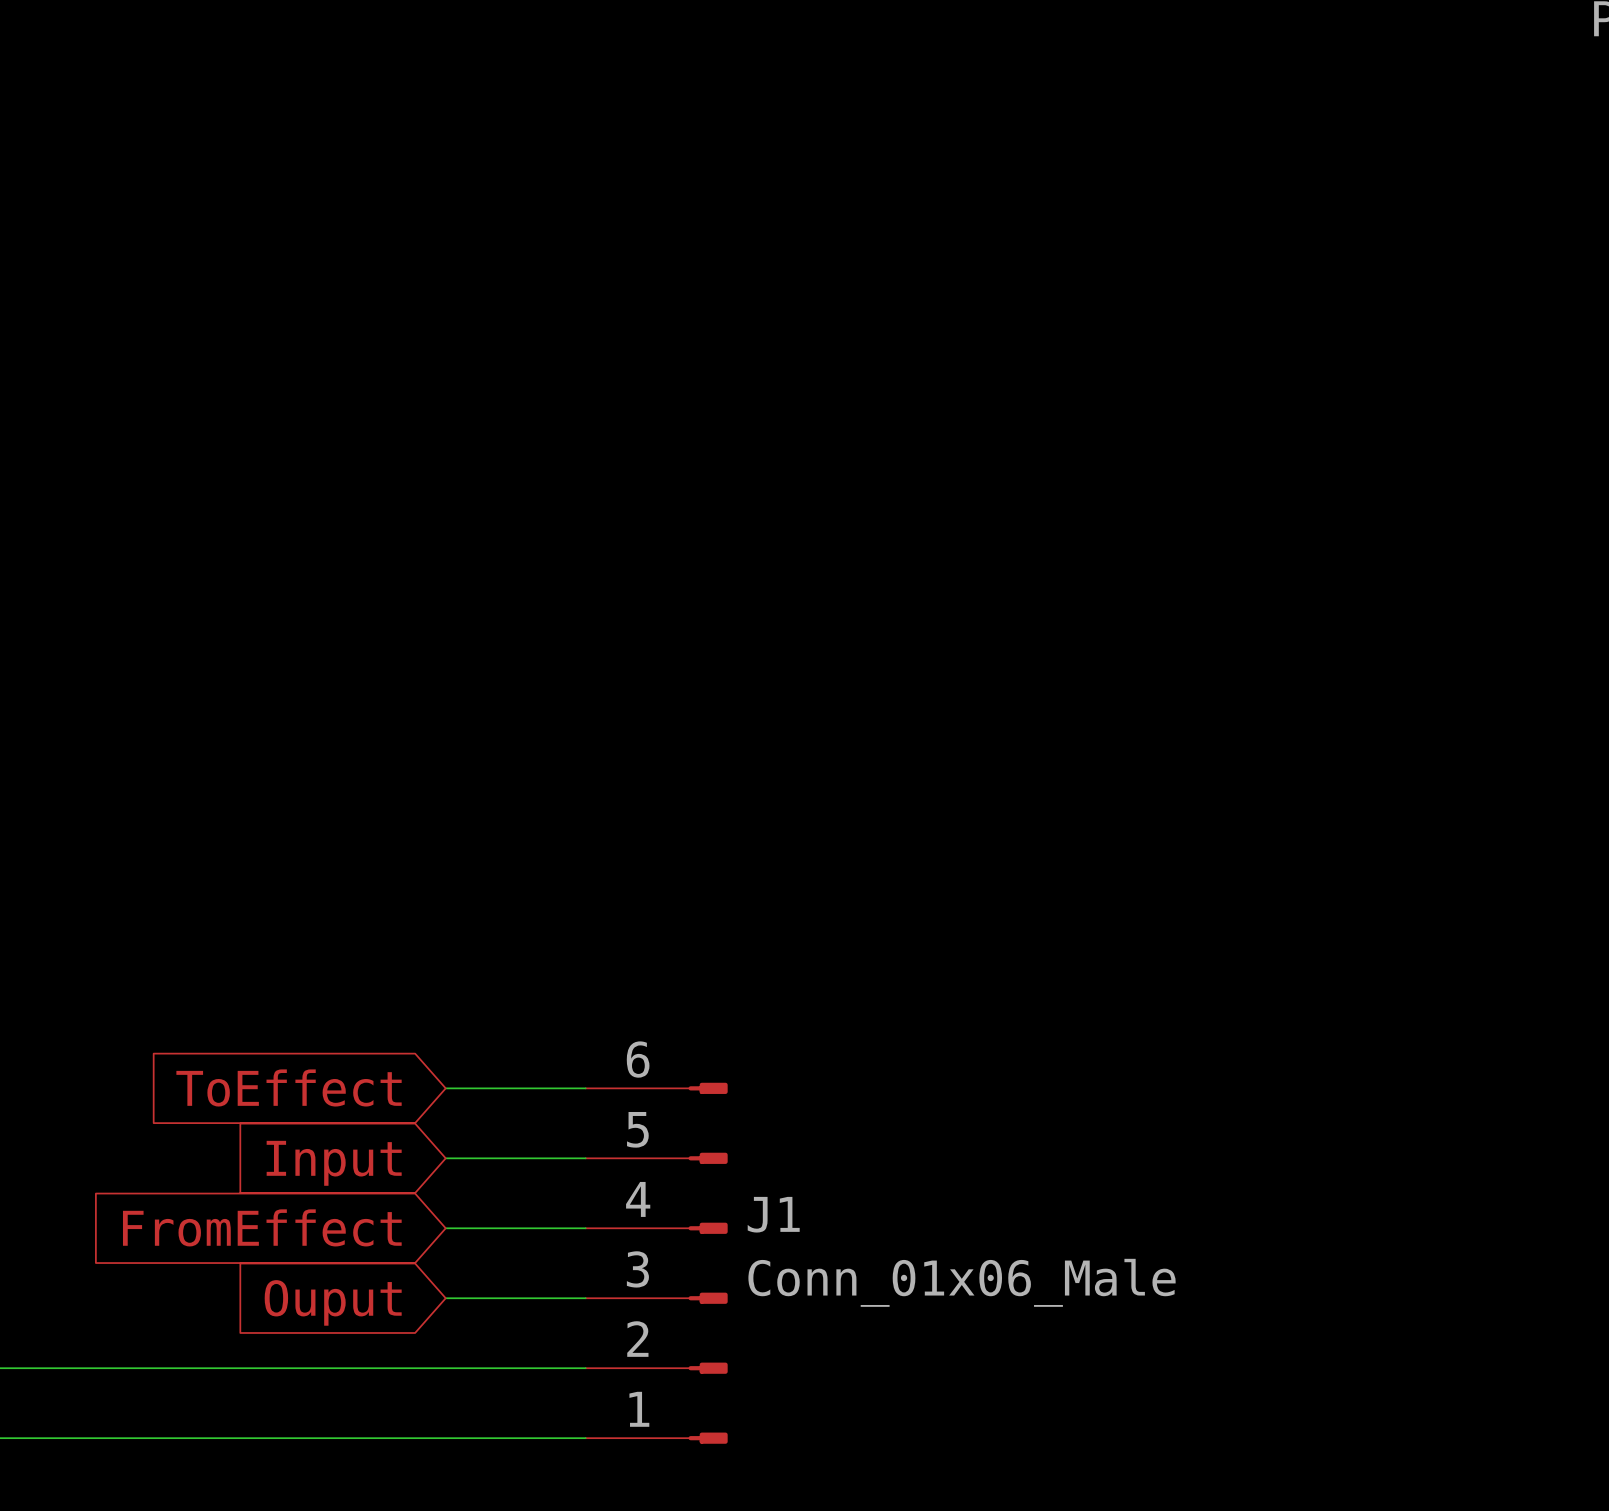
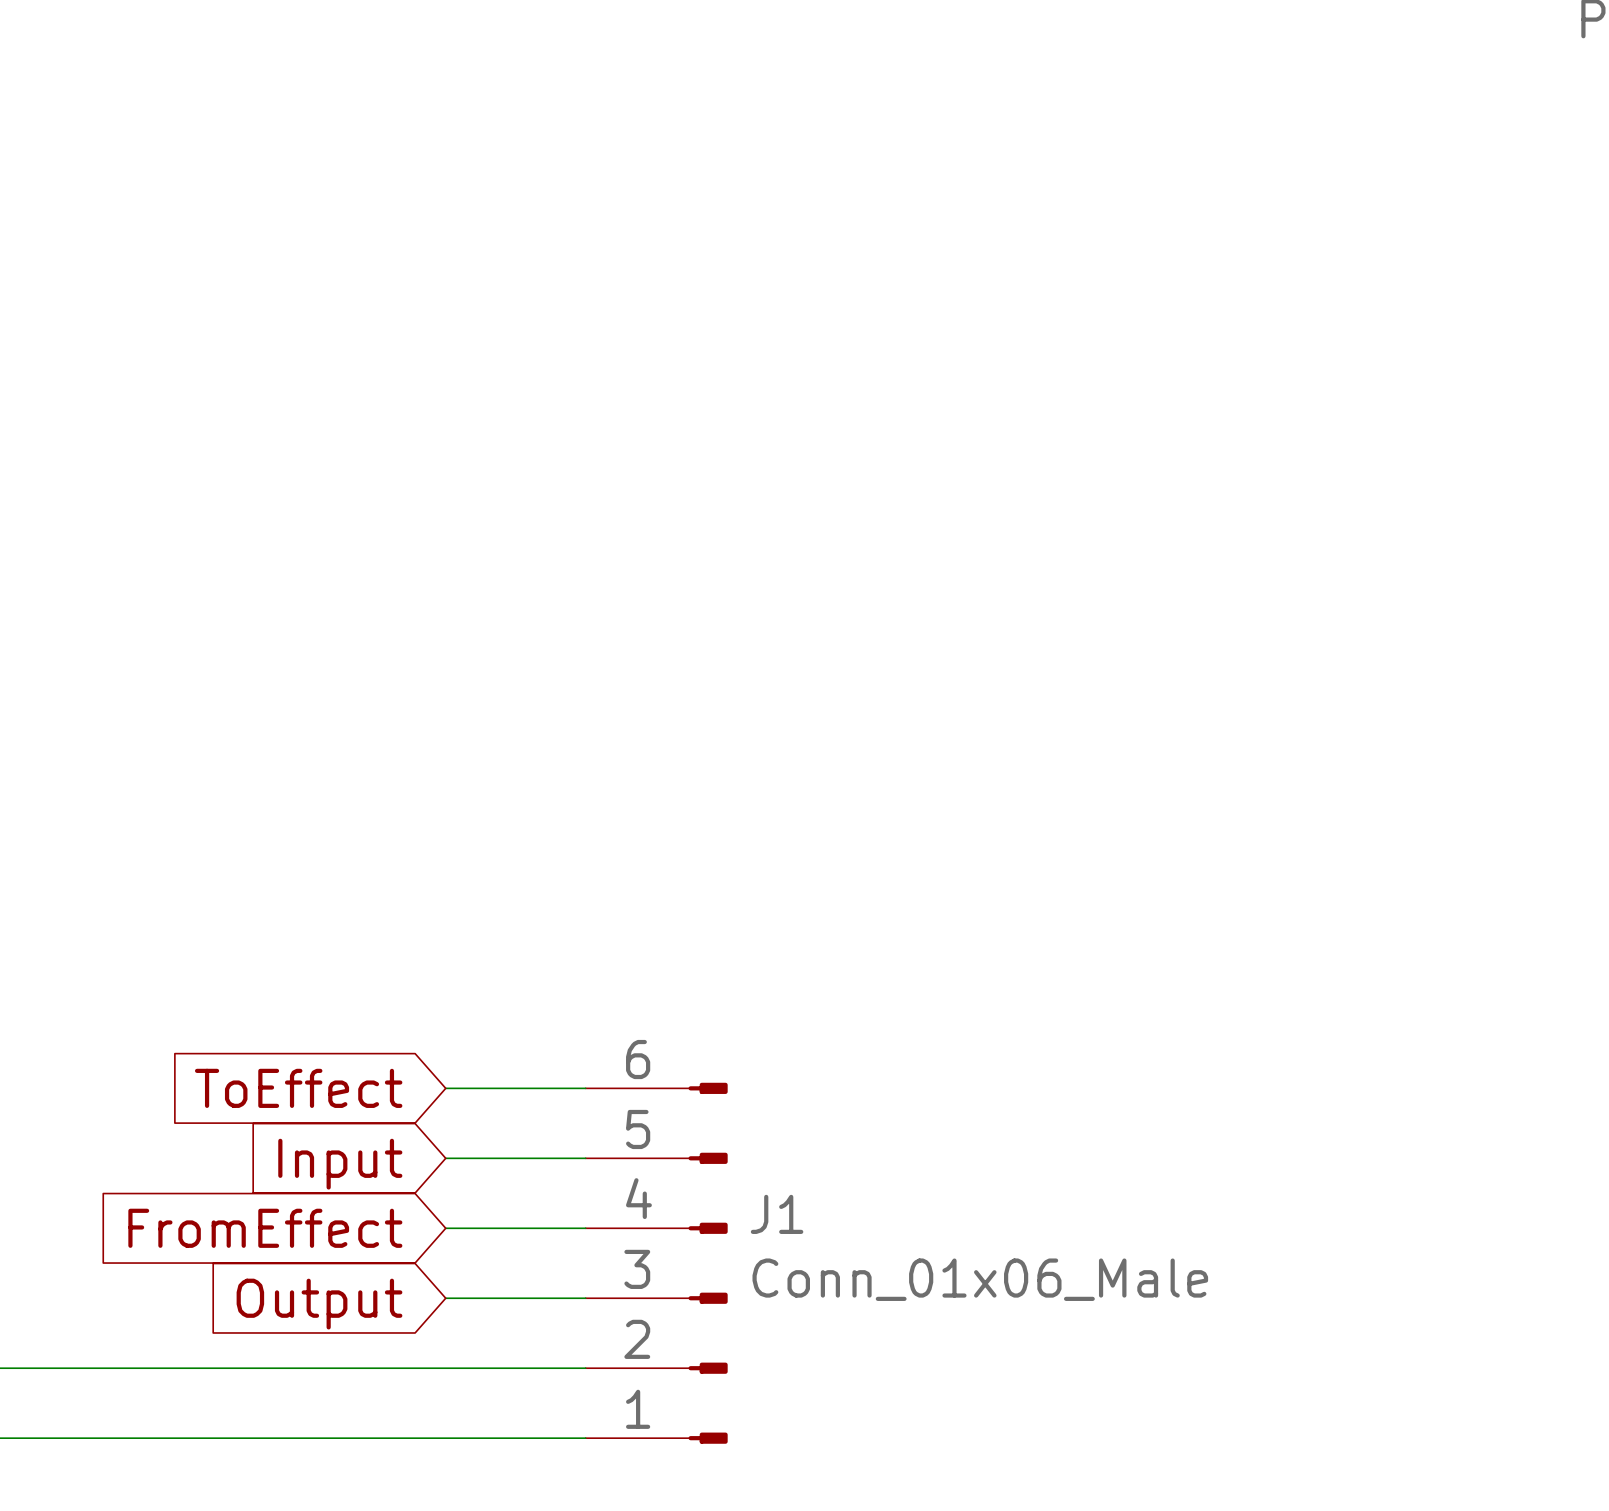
global label: Ouput (333, 1302) -> Output (319, 1304)

